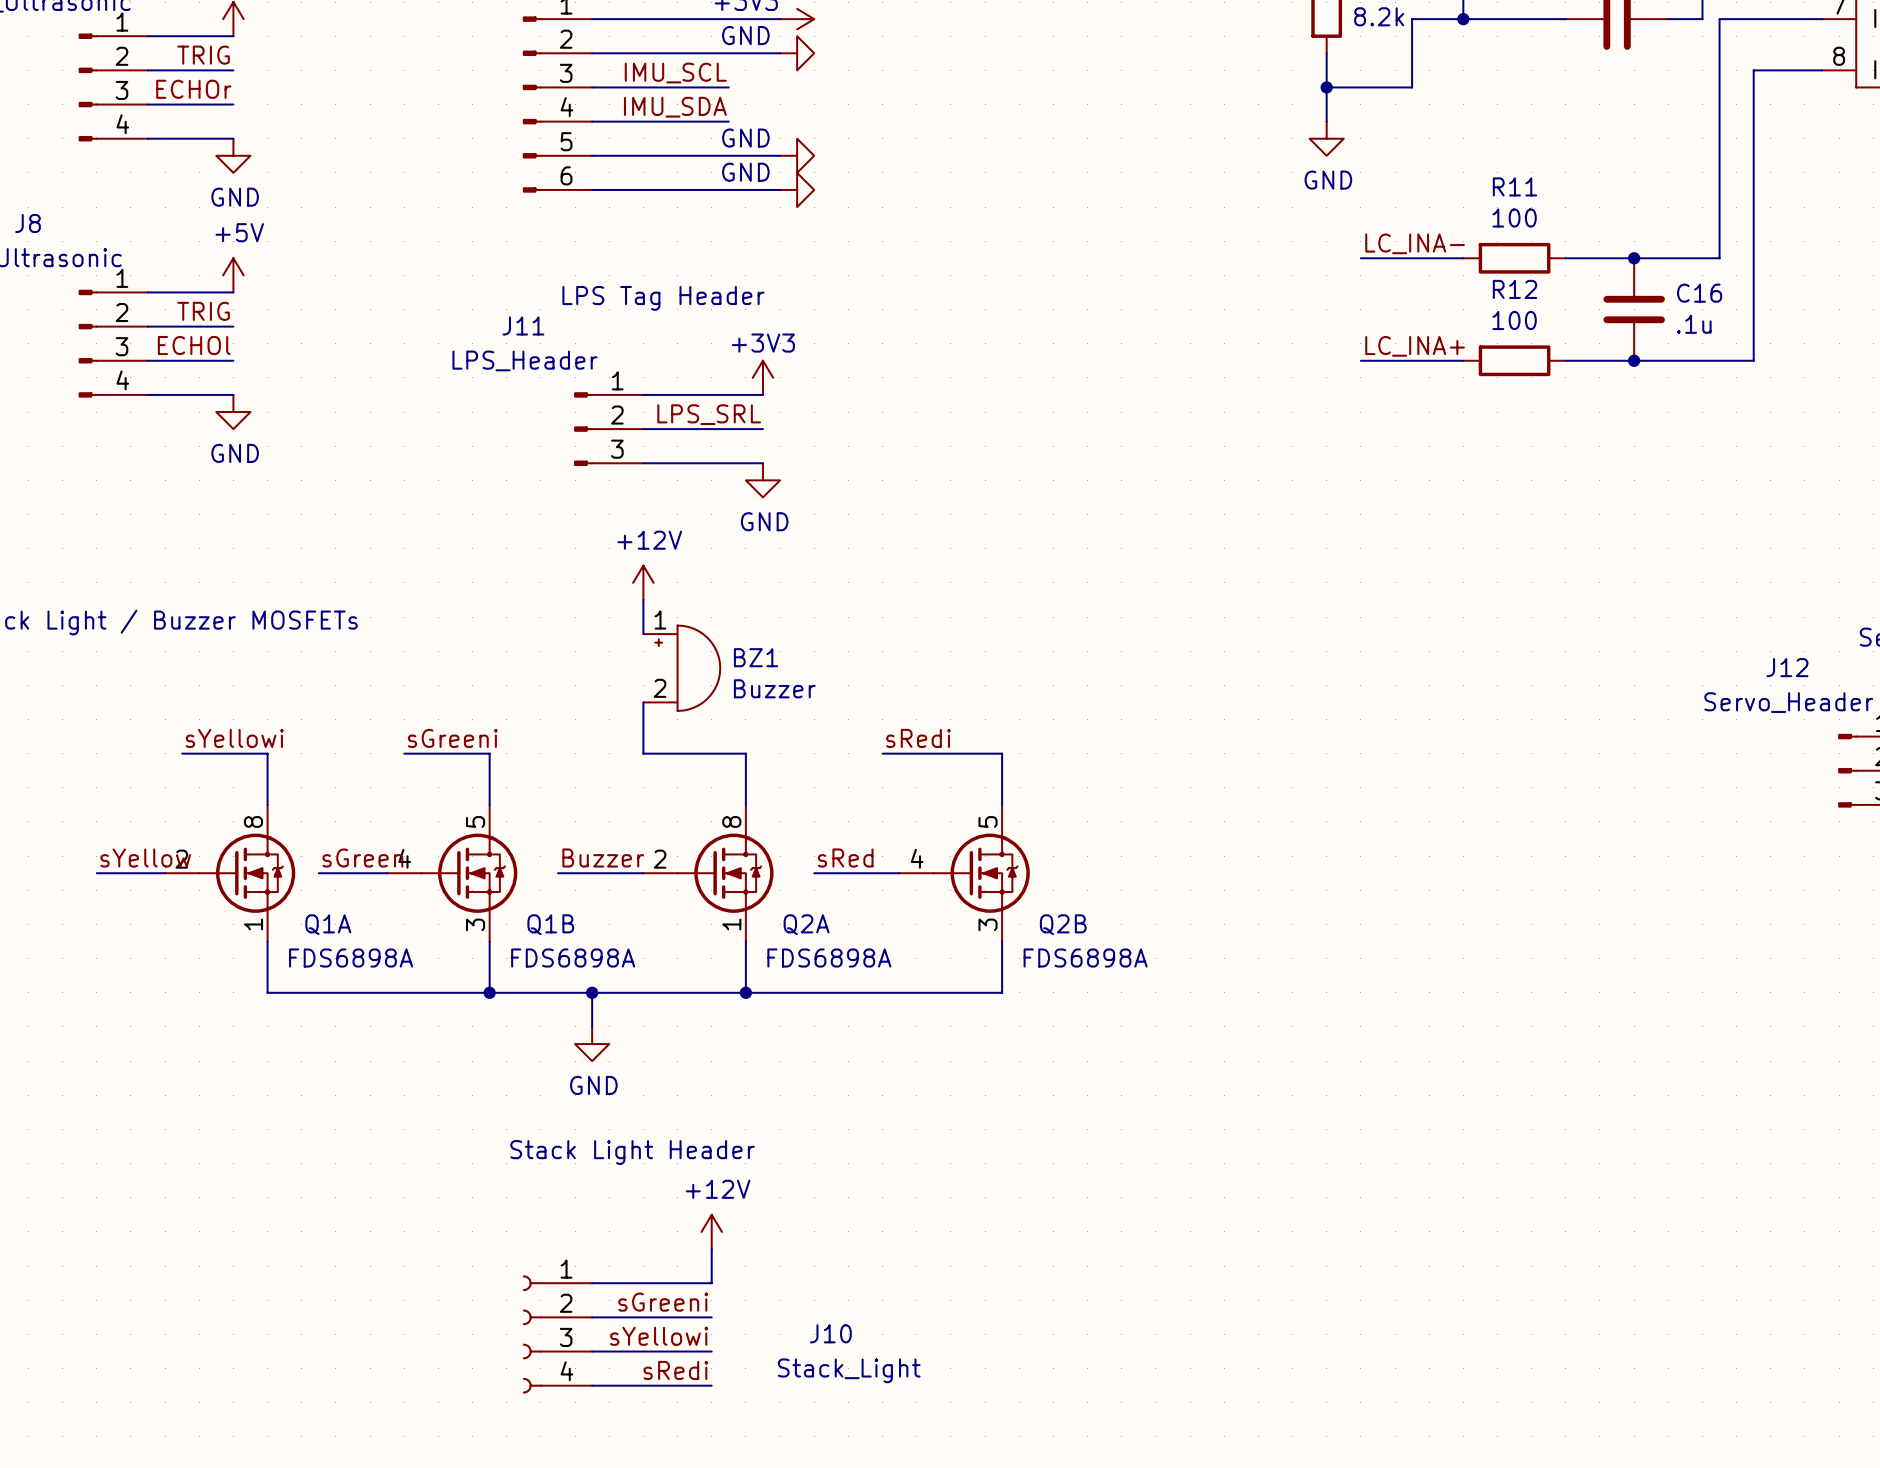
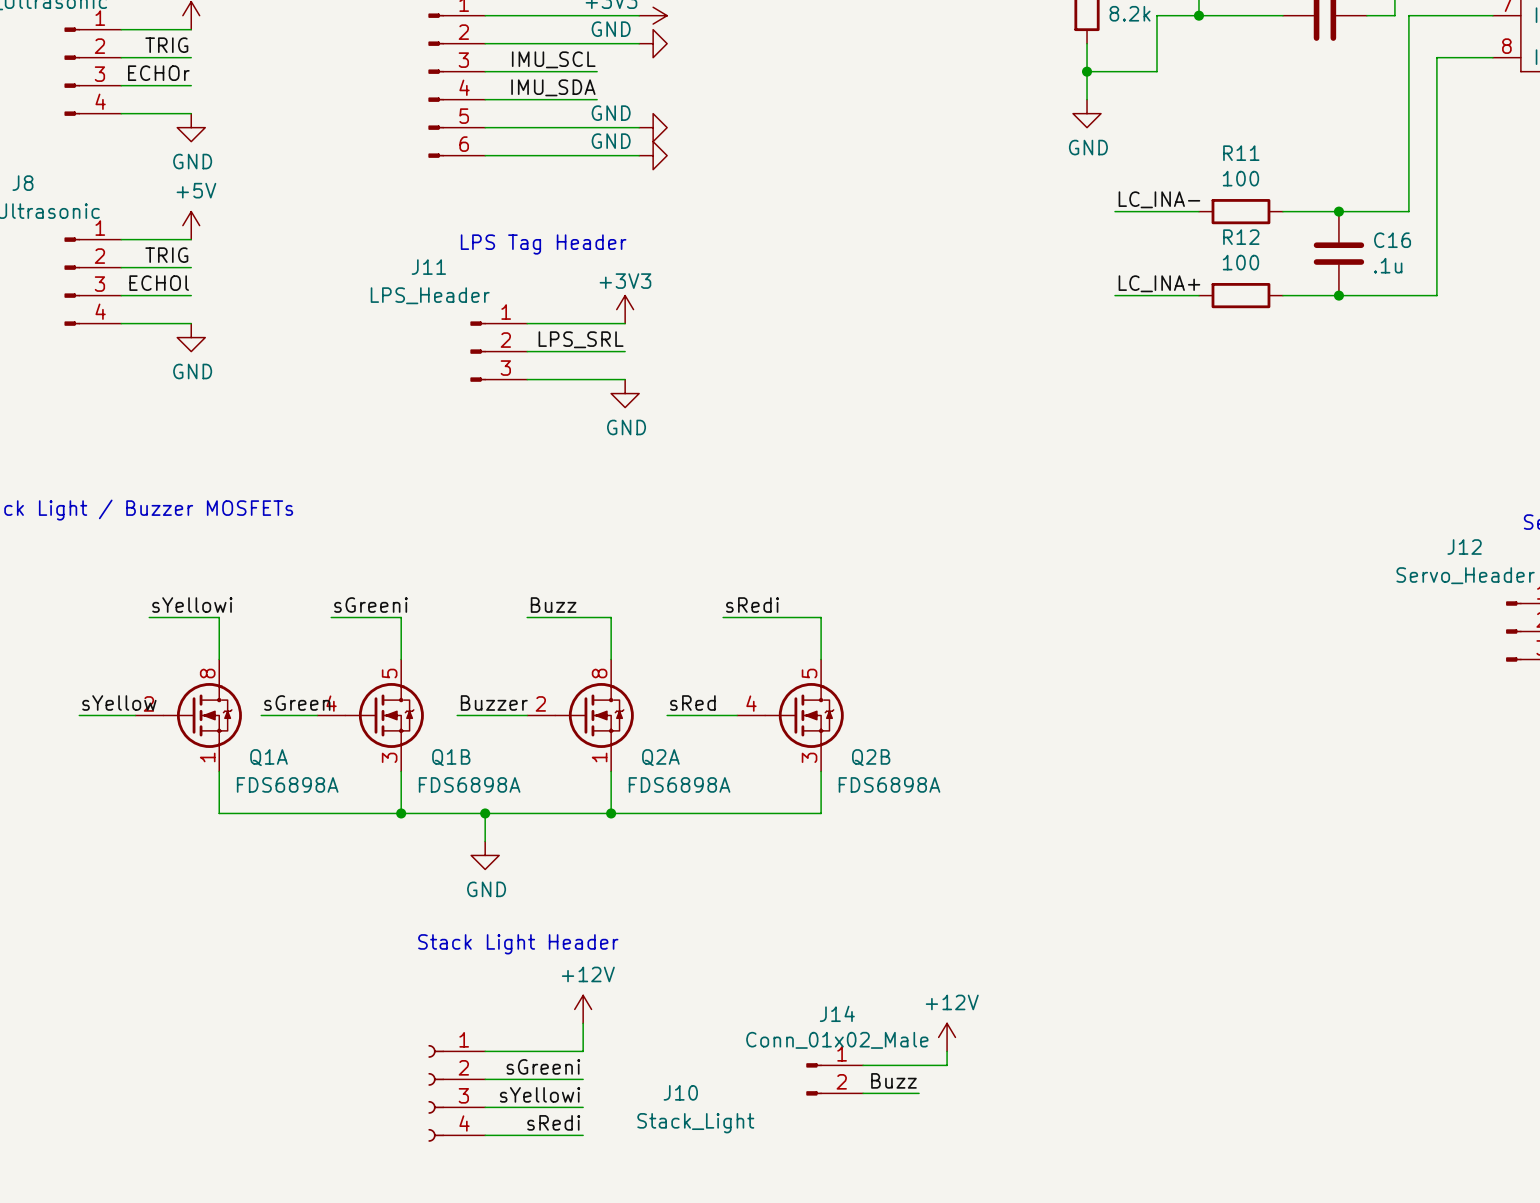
power symbol: +12V (643, 582) -> none
wire: (643, 599) (643, 634) -> none
BZ1: Buzzer (681, 668) -> none
wire: (643, 702) (643, 753) -> none
label: none -> Buzz (553, 605)
power symbol: none -> +12V (947, 1037)
wire: none -> (947, 1051) (947, 1065) (863, 1065)
J14: none -> Conn_01x02_Male (834, 1079)
label: none -> Buzz (893, 1080)
wire: none -> (863, 1093) (919, 1093)

